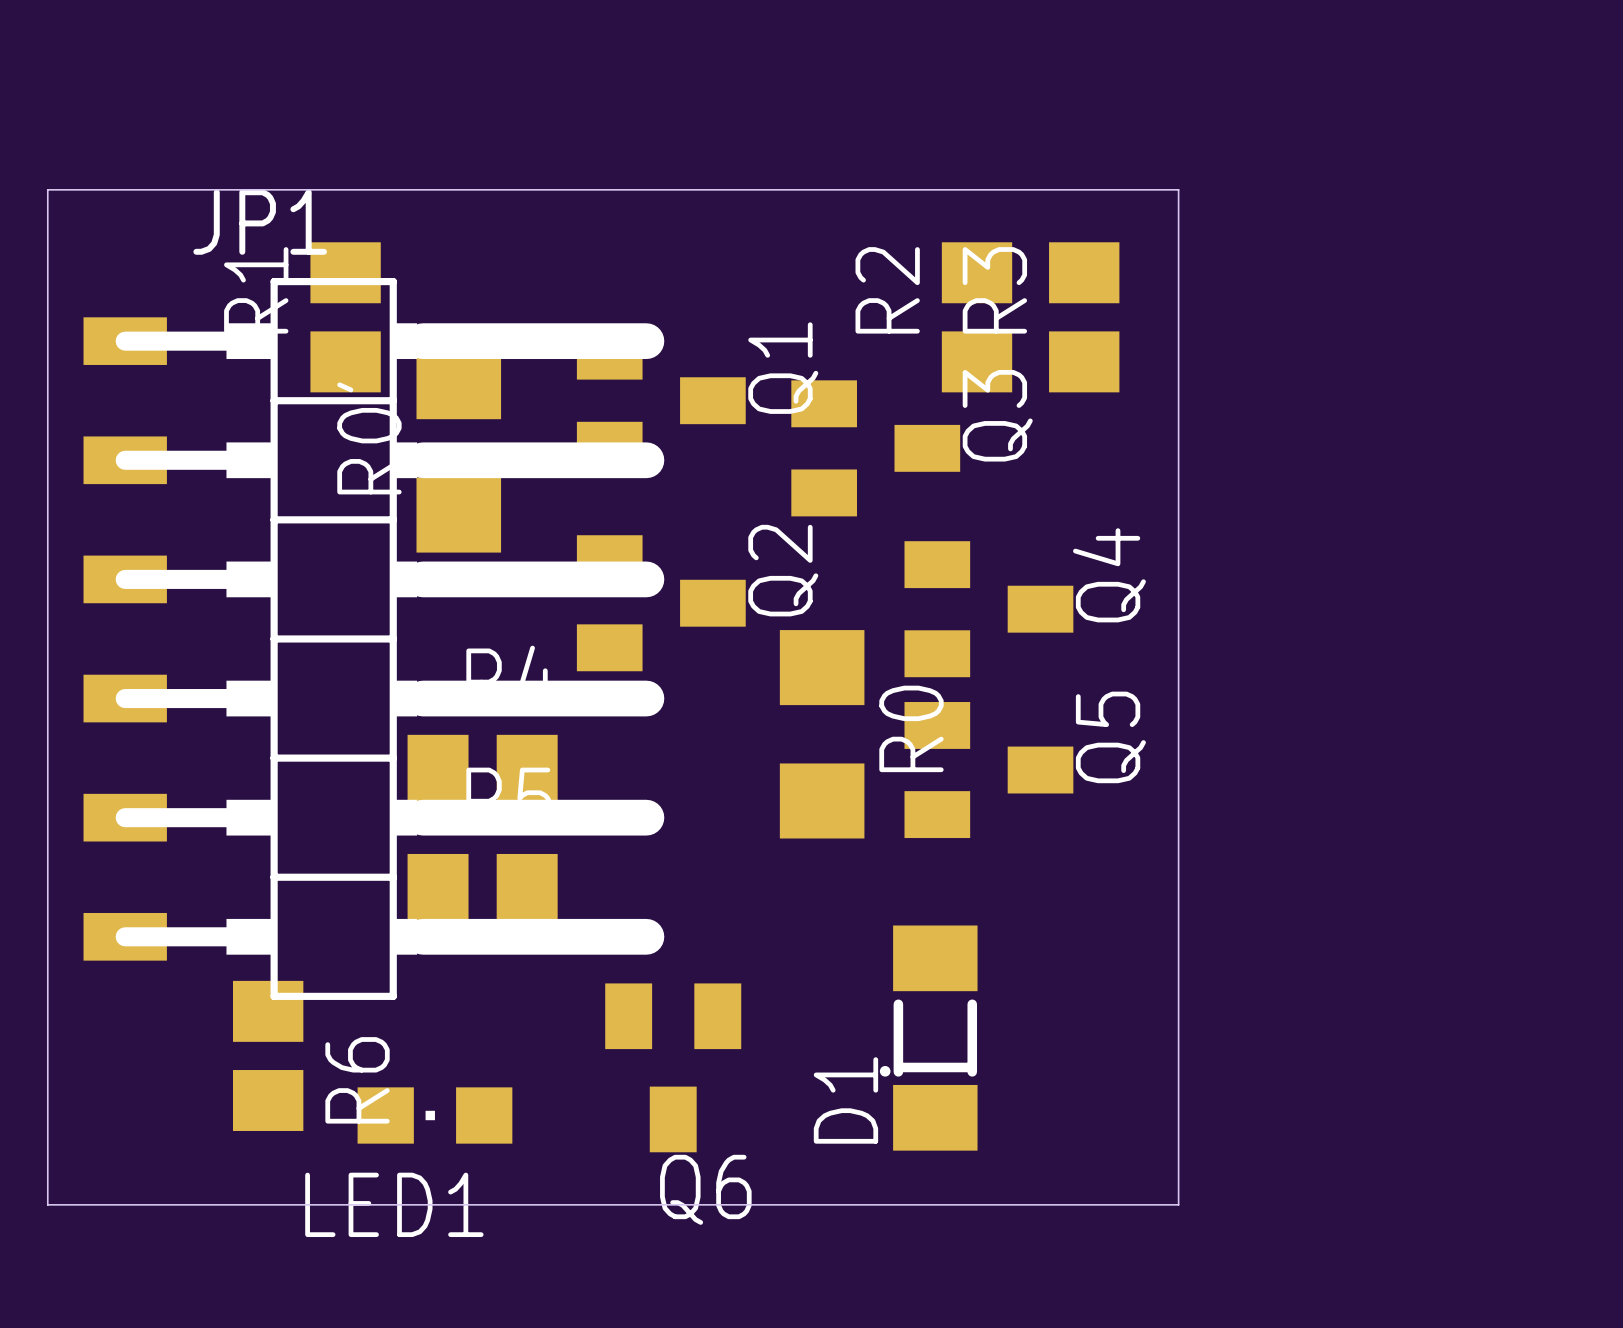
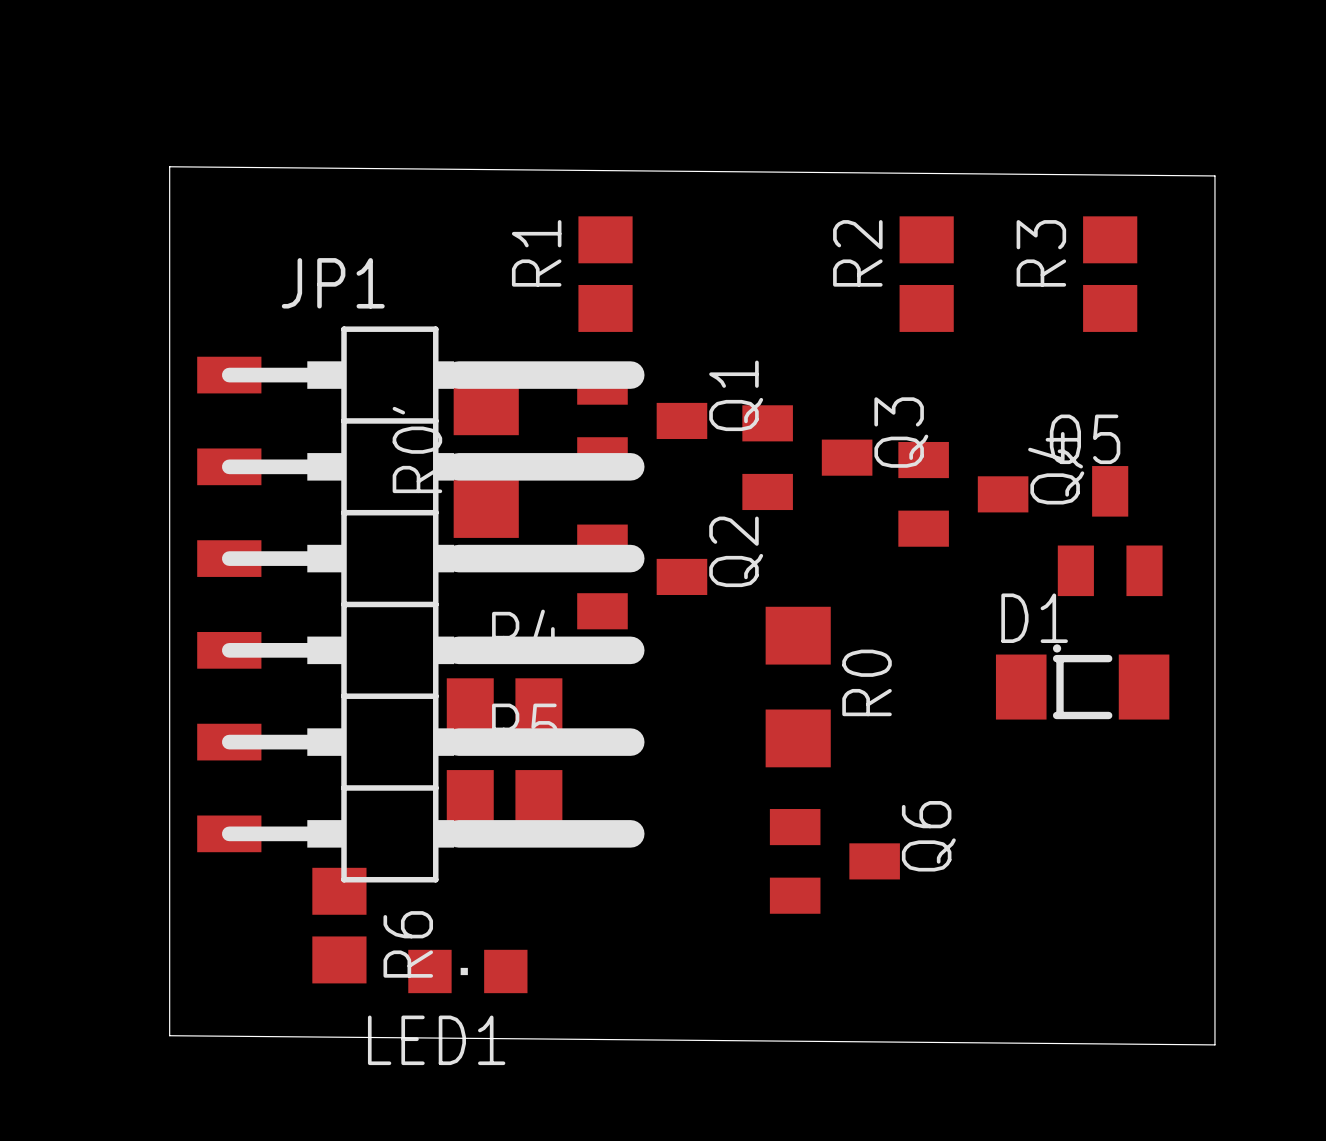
board edge: (47, 189) (1178, 189) (1178, 1204) (47, 1204) (47, 1198) -> (169, 258) (169, 166) (1214, 175) (1214, 1044) (169, 1035)
R1 position: (345, 317) -> (605, 274)
R2 position: (977, 317) -> (926, 274)
R3 position: (1084, 317) -> (1110, 274)
Q4 position: (988, 609) -> (963, 494)
R0 position: (822, 734) -> (798, 687)
Q5 rotation: 0° (988, 770) -> 90° counterclockwise (1110, 531)
Q5 position: (988, 770) -> (1110, 531)
D1 rotation: 0° (928, 1038) -> 90° clockwise (1082, 681)
D1 position: (928, 1038) -> (1082, 681)
Q6 rotation: 0° (673, 1067) -> 90° counterclockwise (834, 861)
Q6 position: (673, 1067) -> (834, 861)

